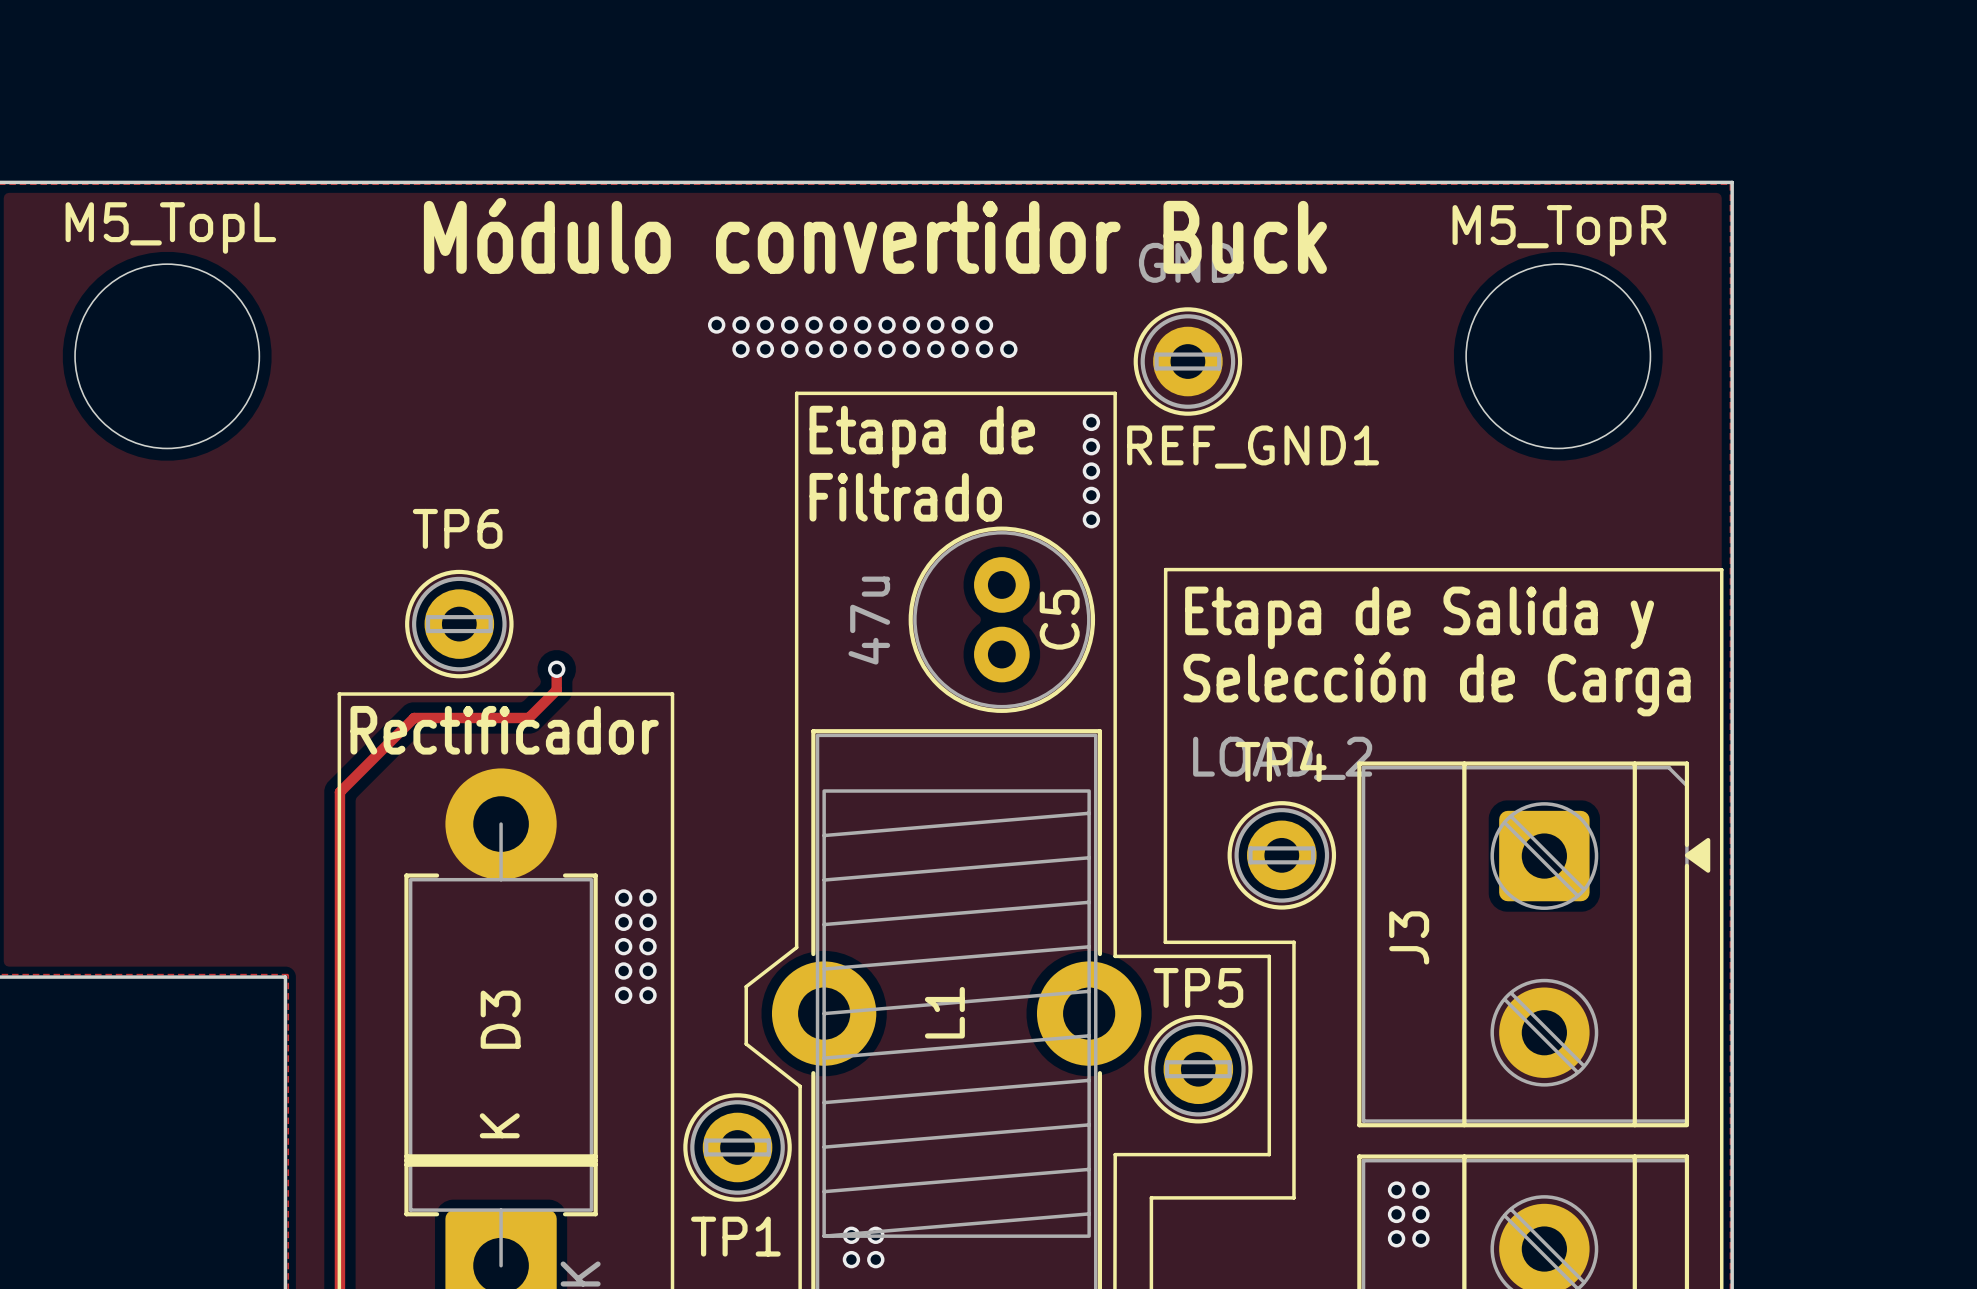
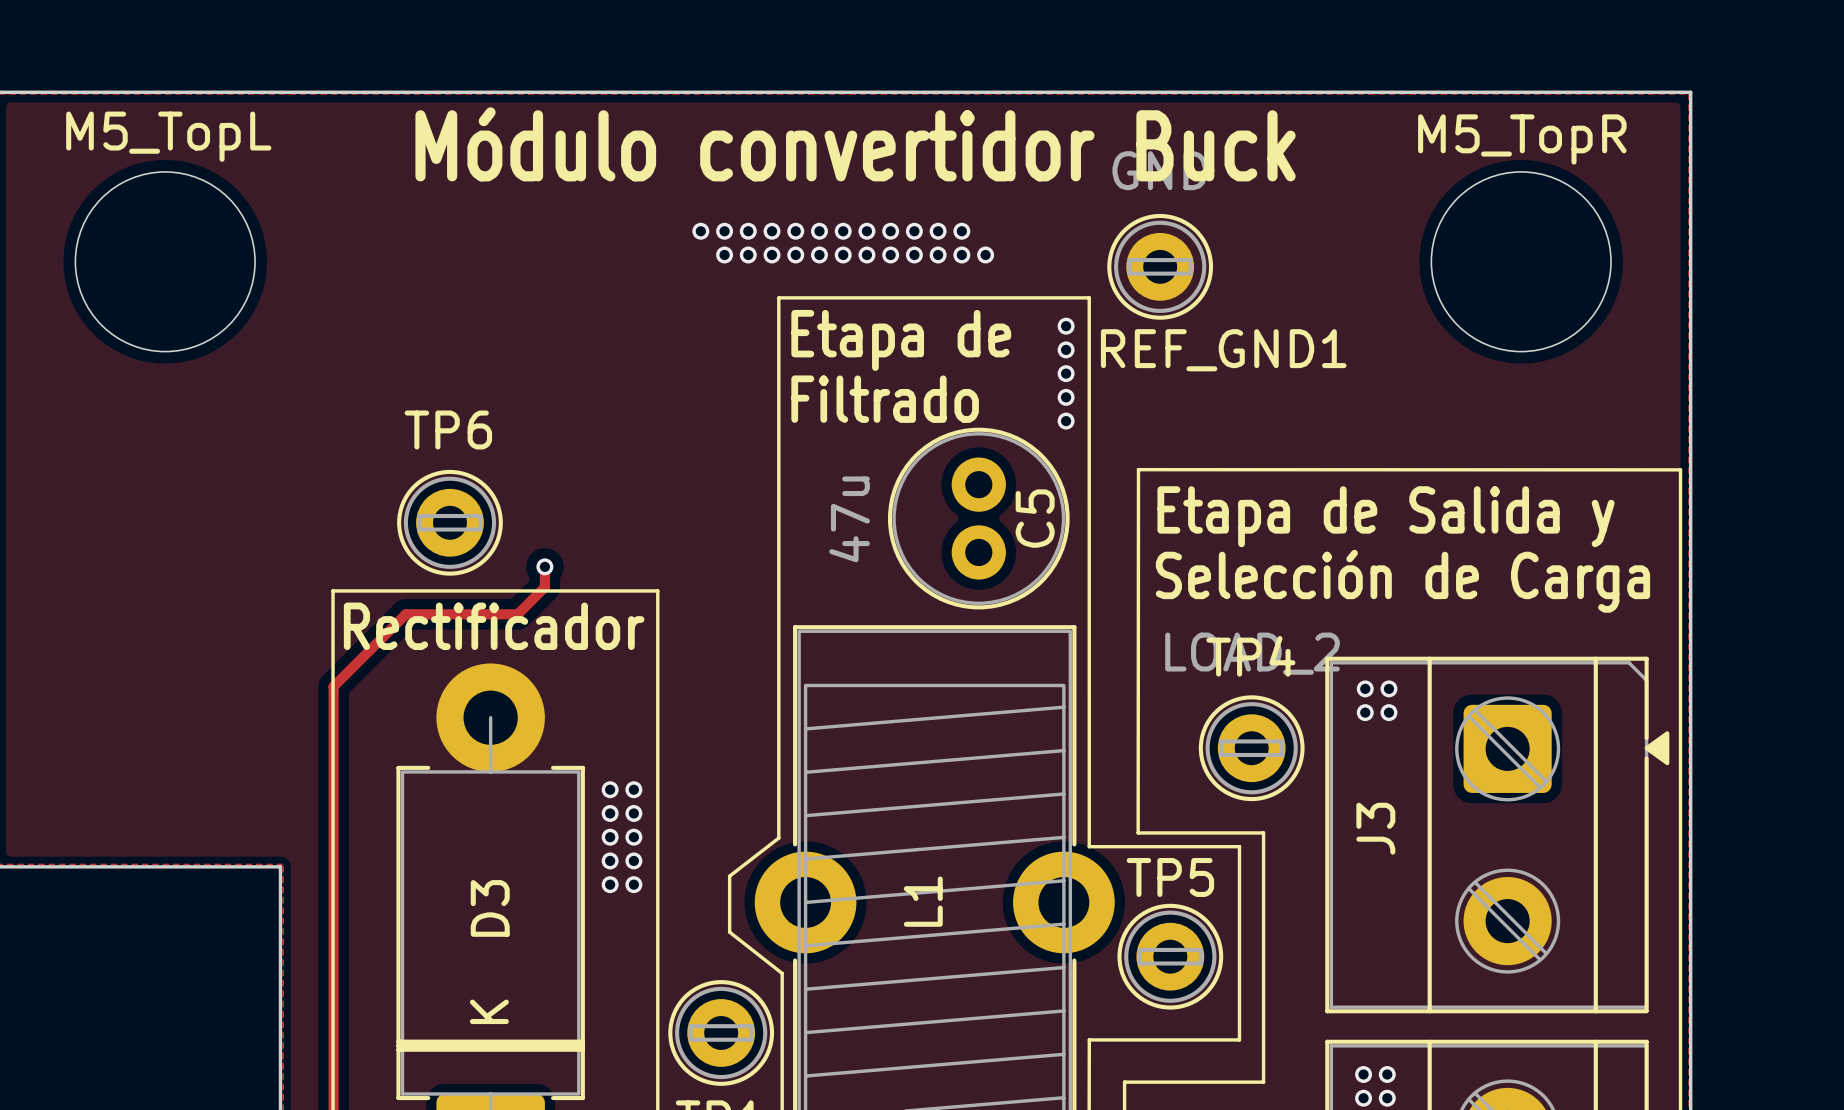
via: none -> (1365, 688)
via: none -> (1388, 688)
via: none -> (1365, 712)
via: none -> (1388, 712)

